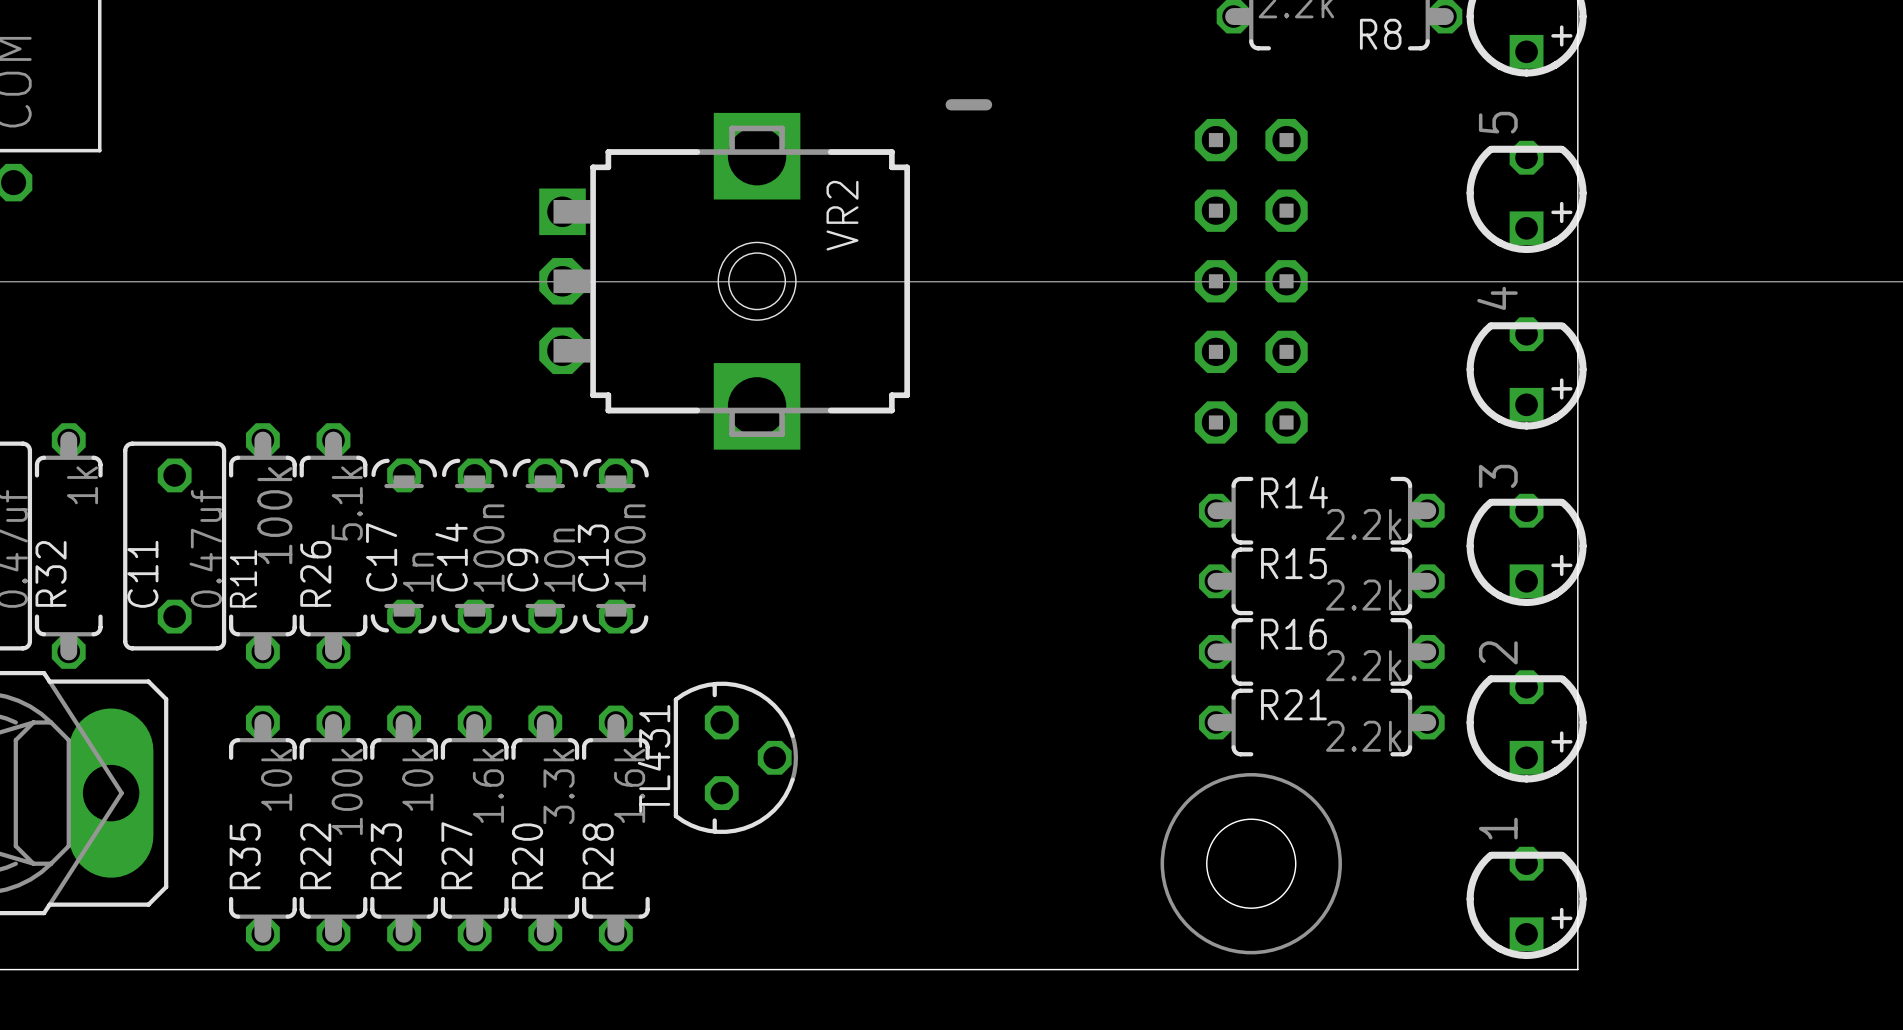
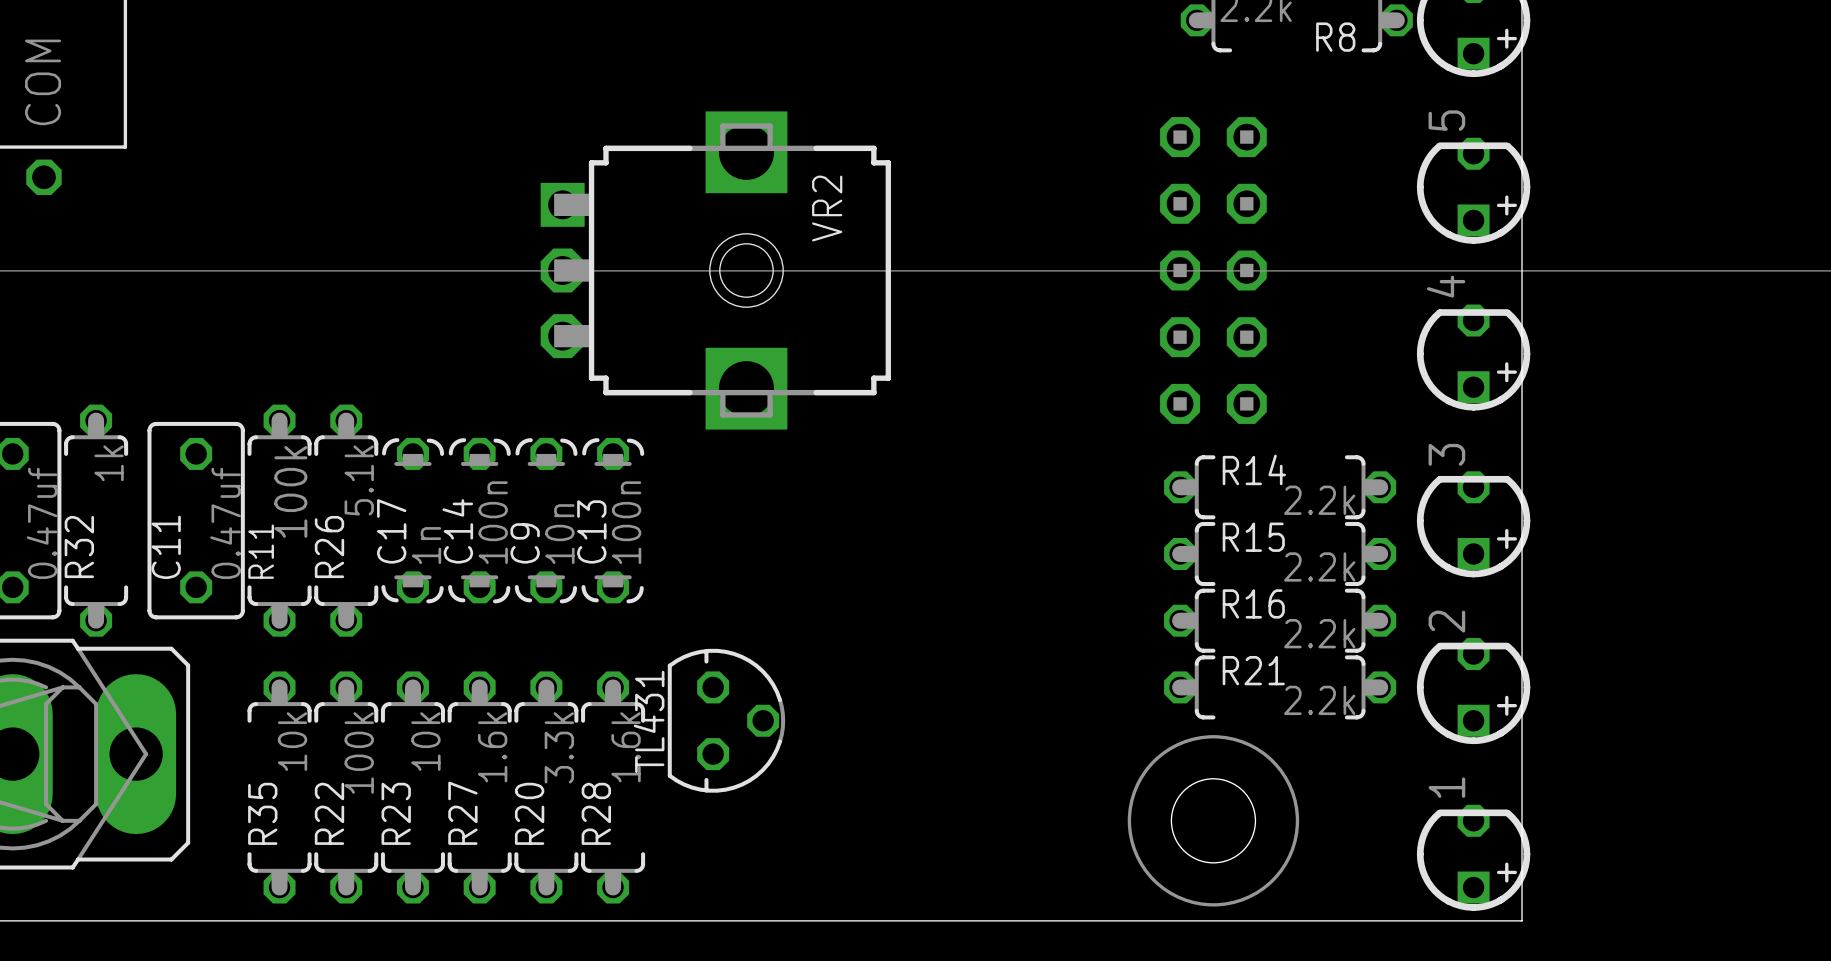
line: (951, 104) (986, 104) -> none

